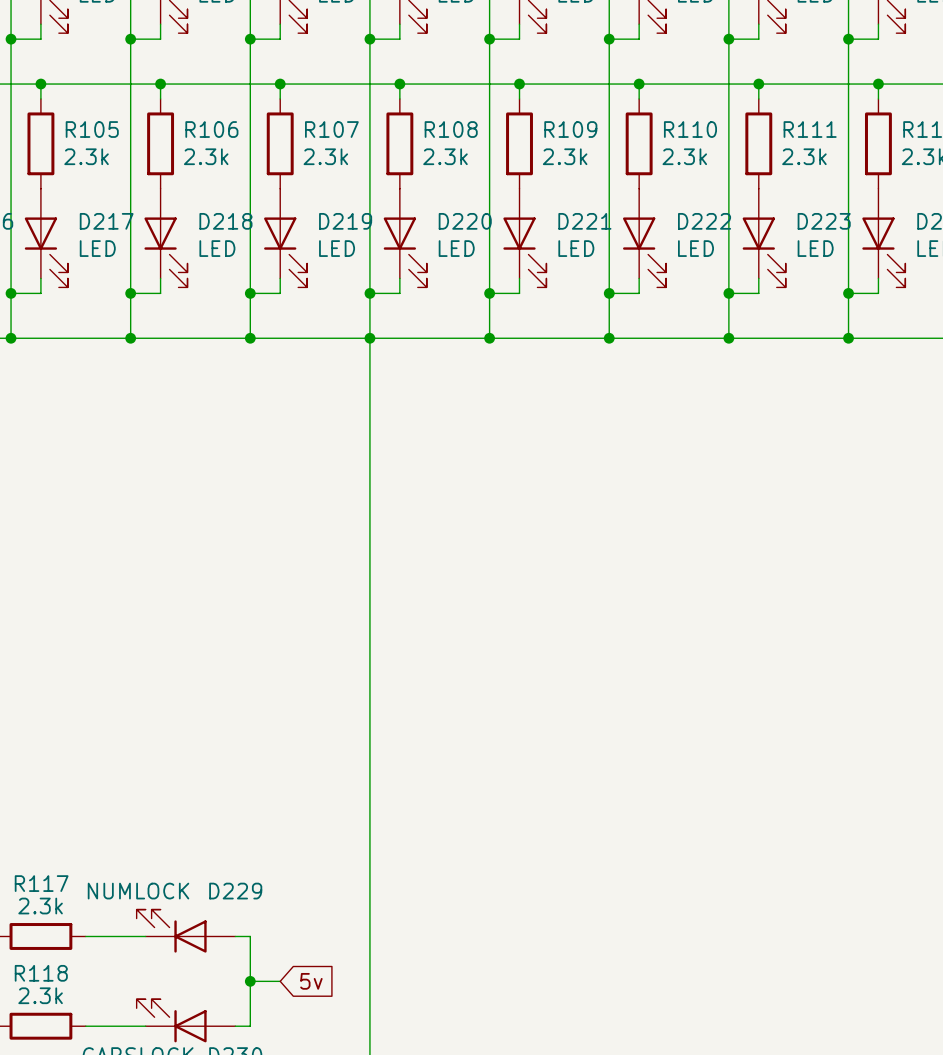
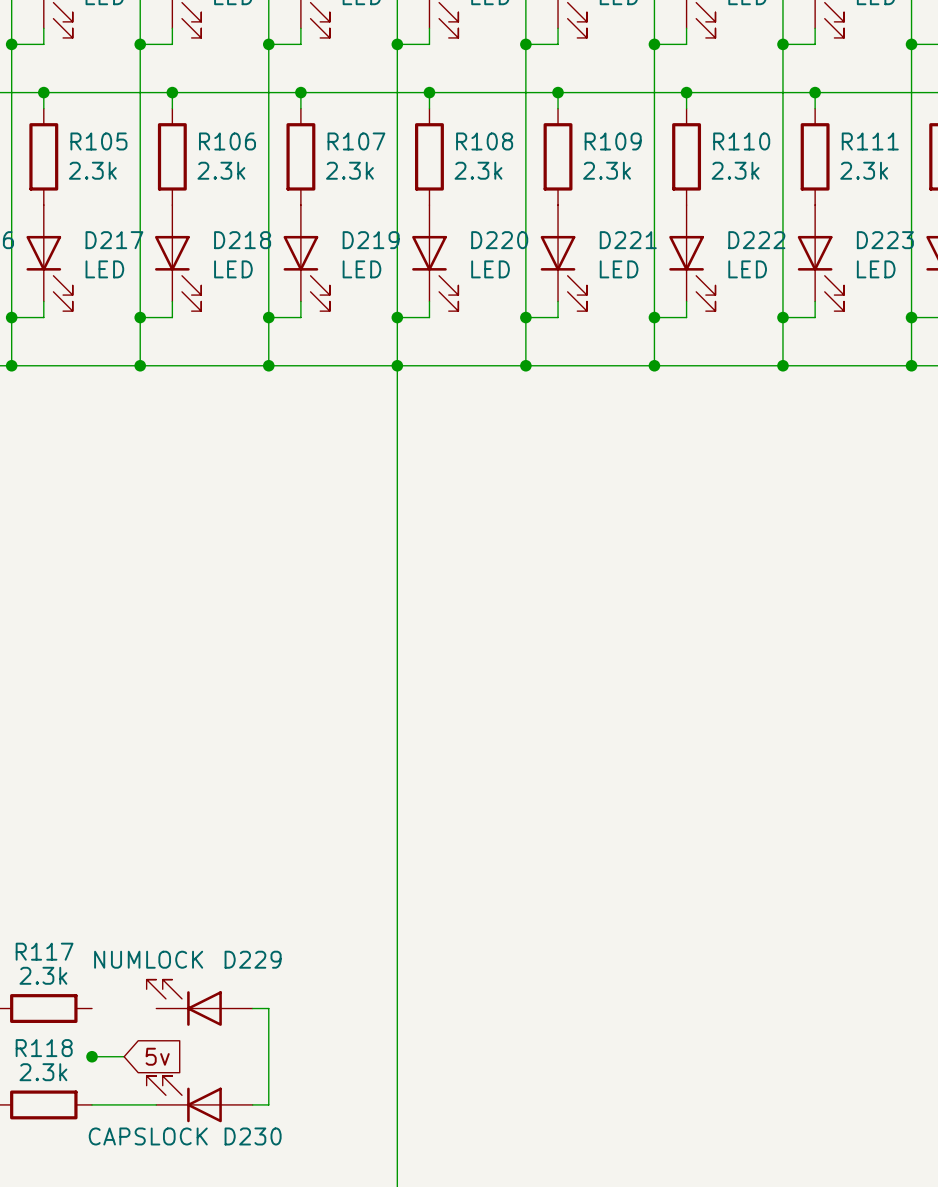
wire: (85, 936) (145, 936) -> none
junction: none -> (92, 1056)
wire: (250, 981) (280, 981) -> (92, 1056) (124, 1056)
junction: (250, 981) -> none
global label position: 5v (311, 981) -> 5v (157, 1056)

